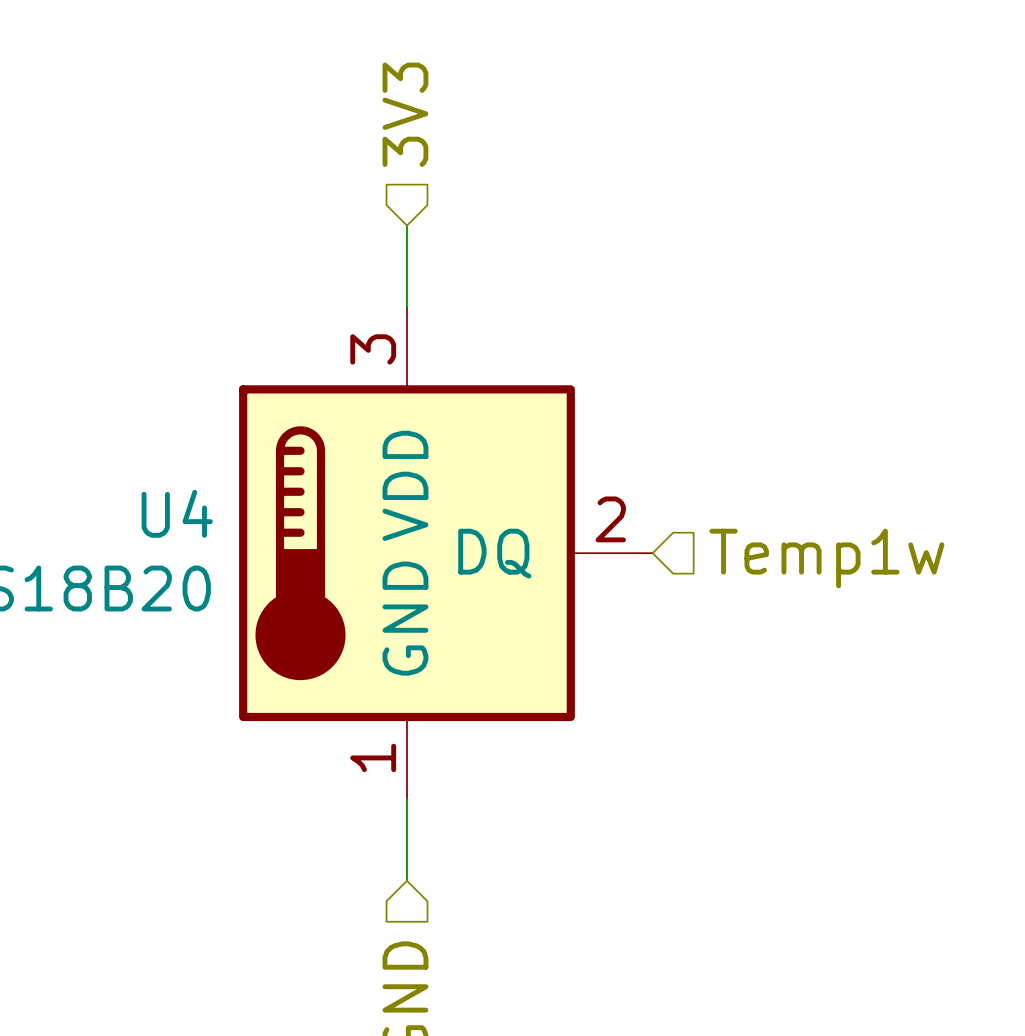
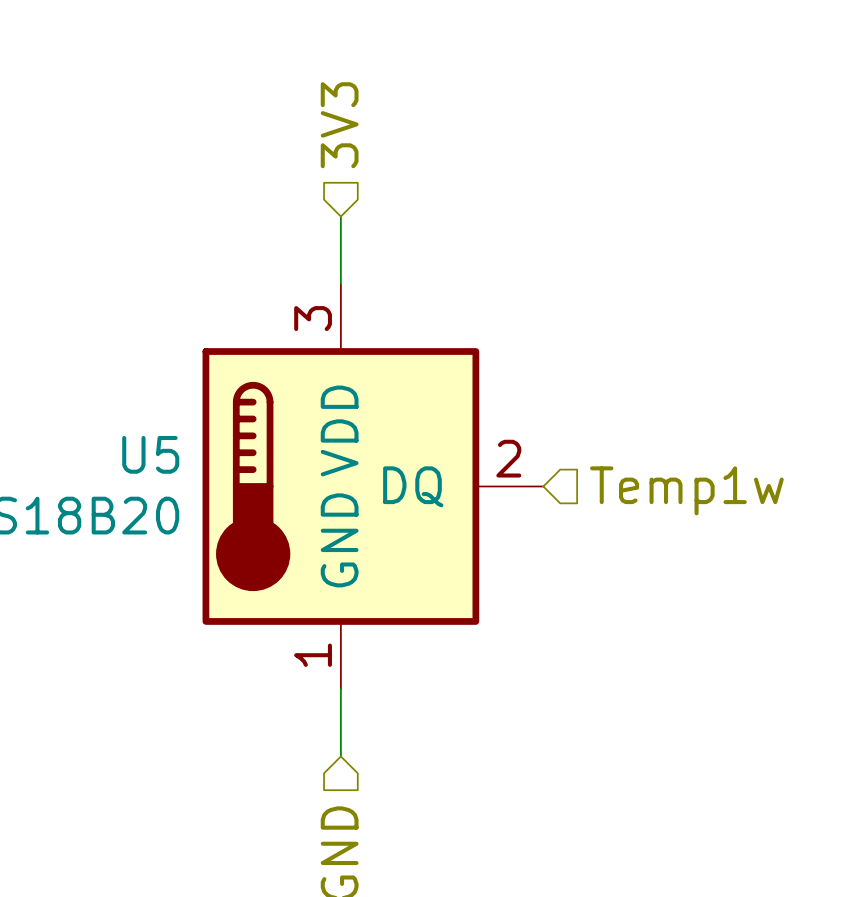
U4 name: U4 (177, 513) -> U5 (150, 454)

